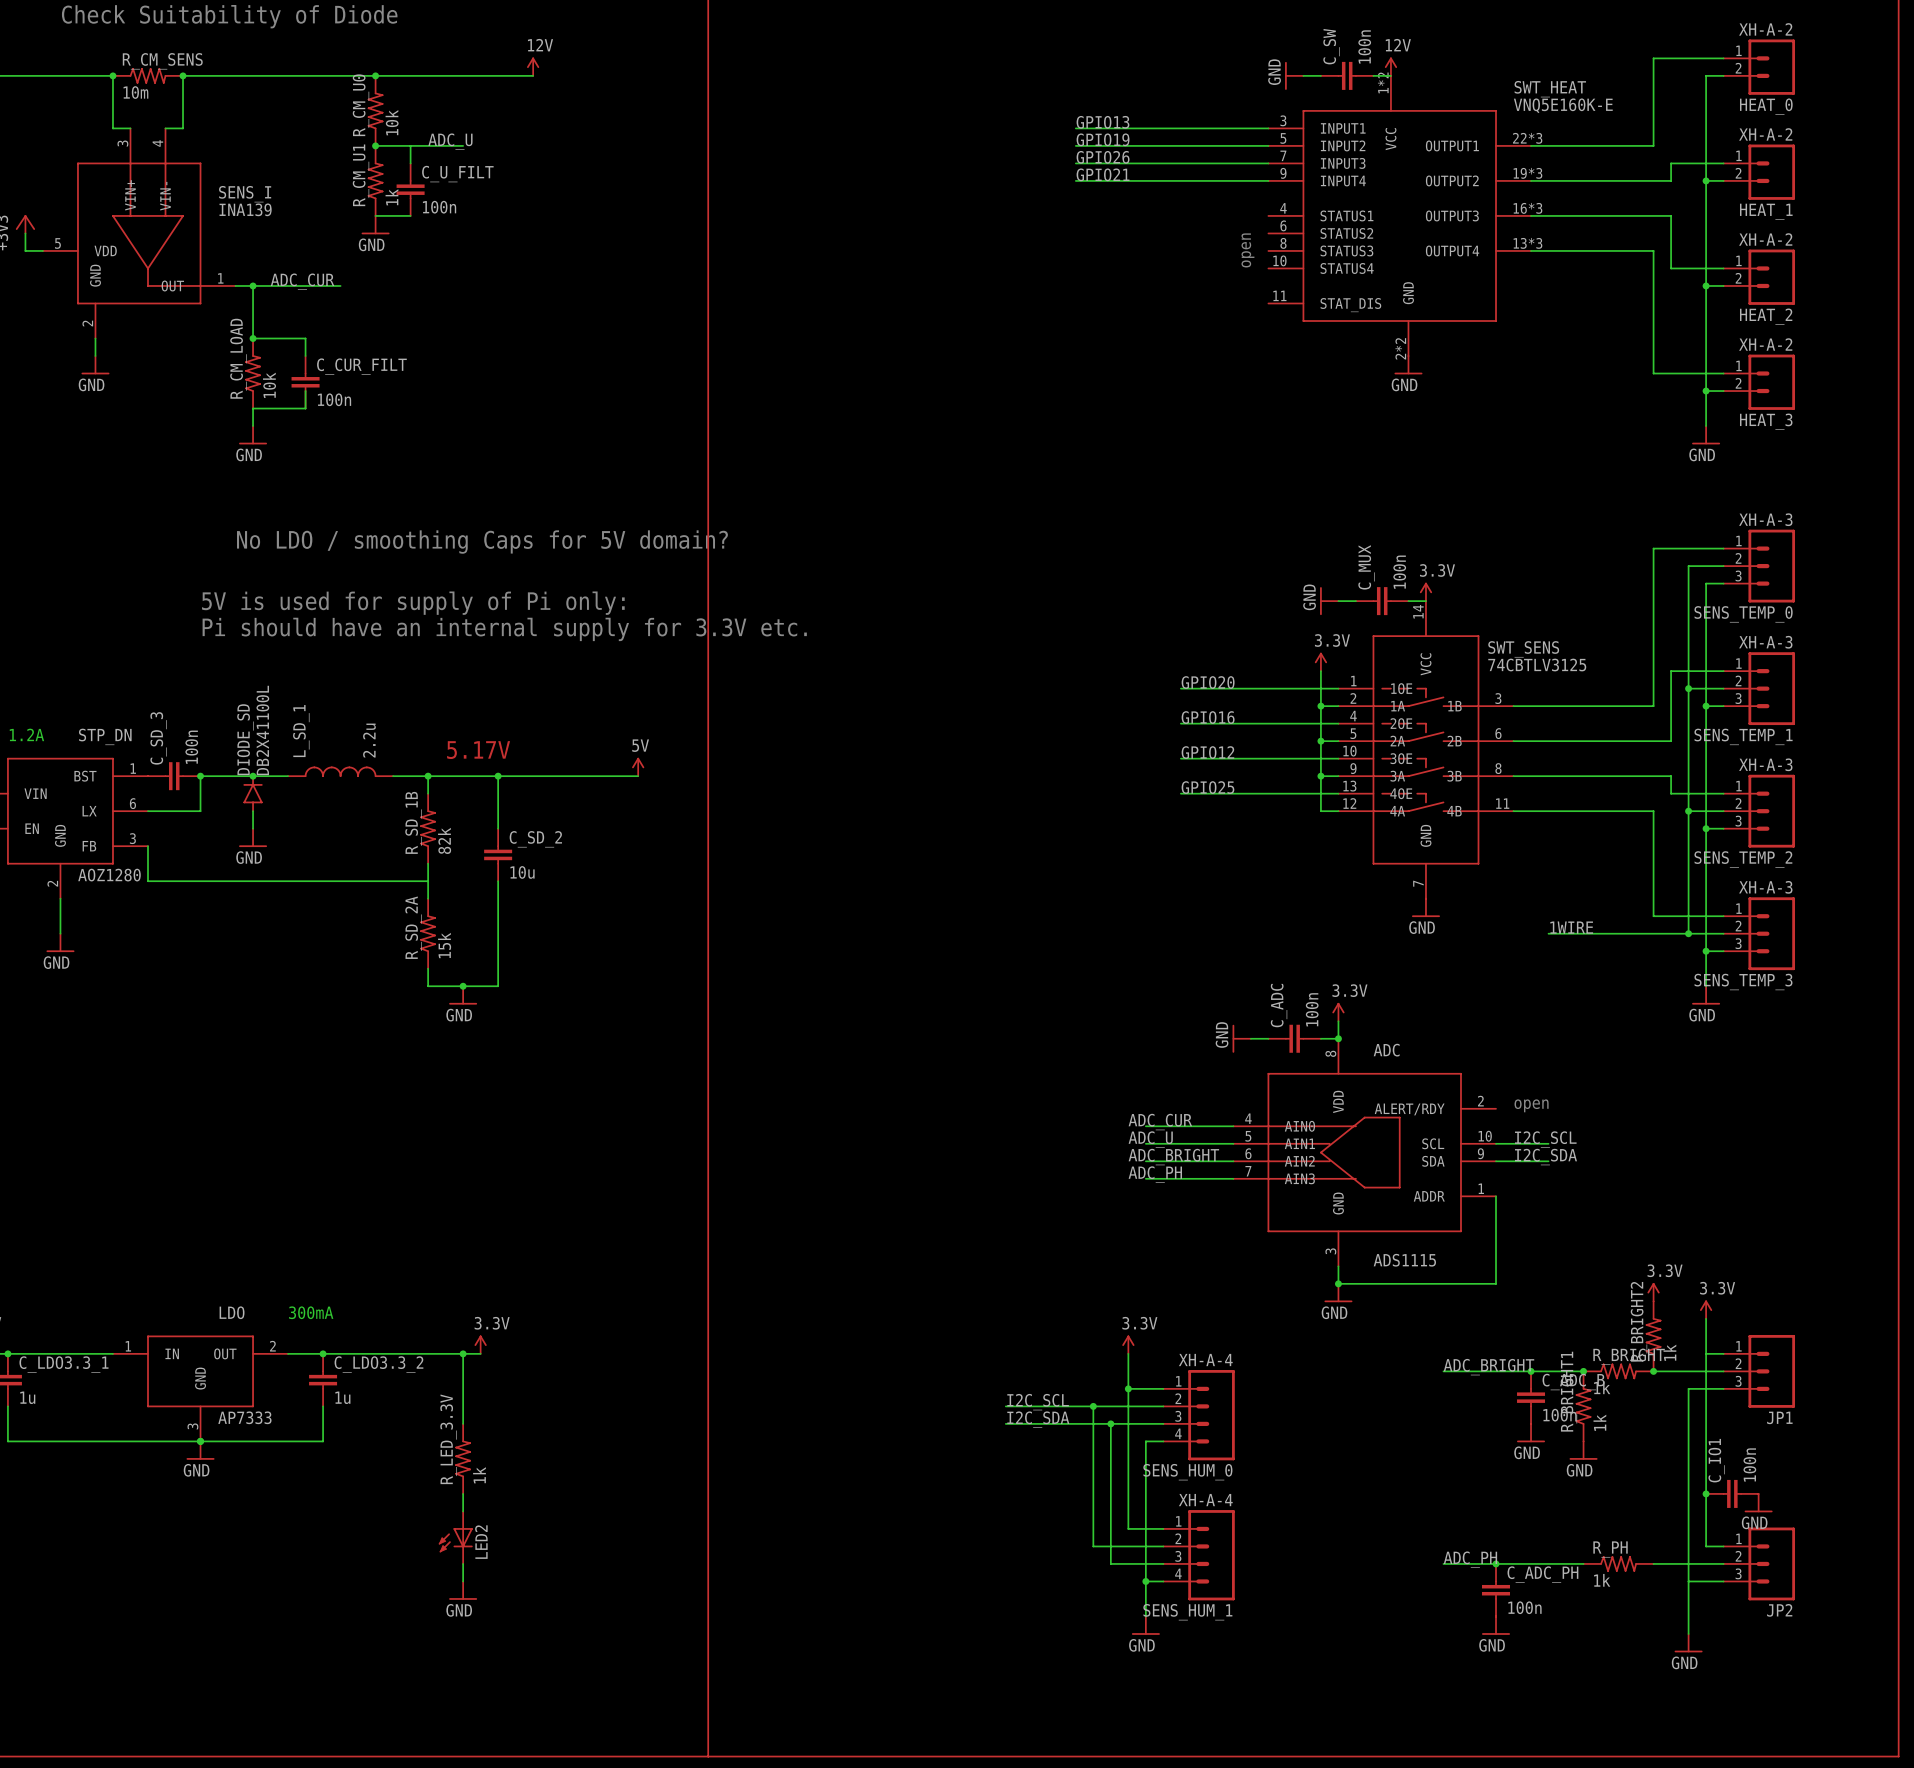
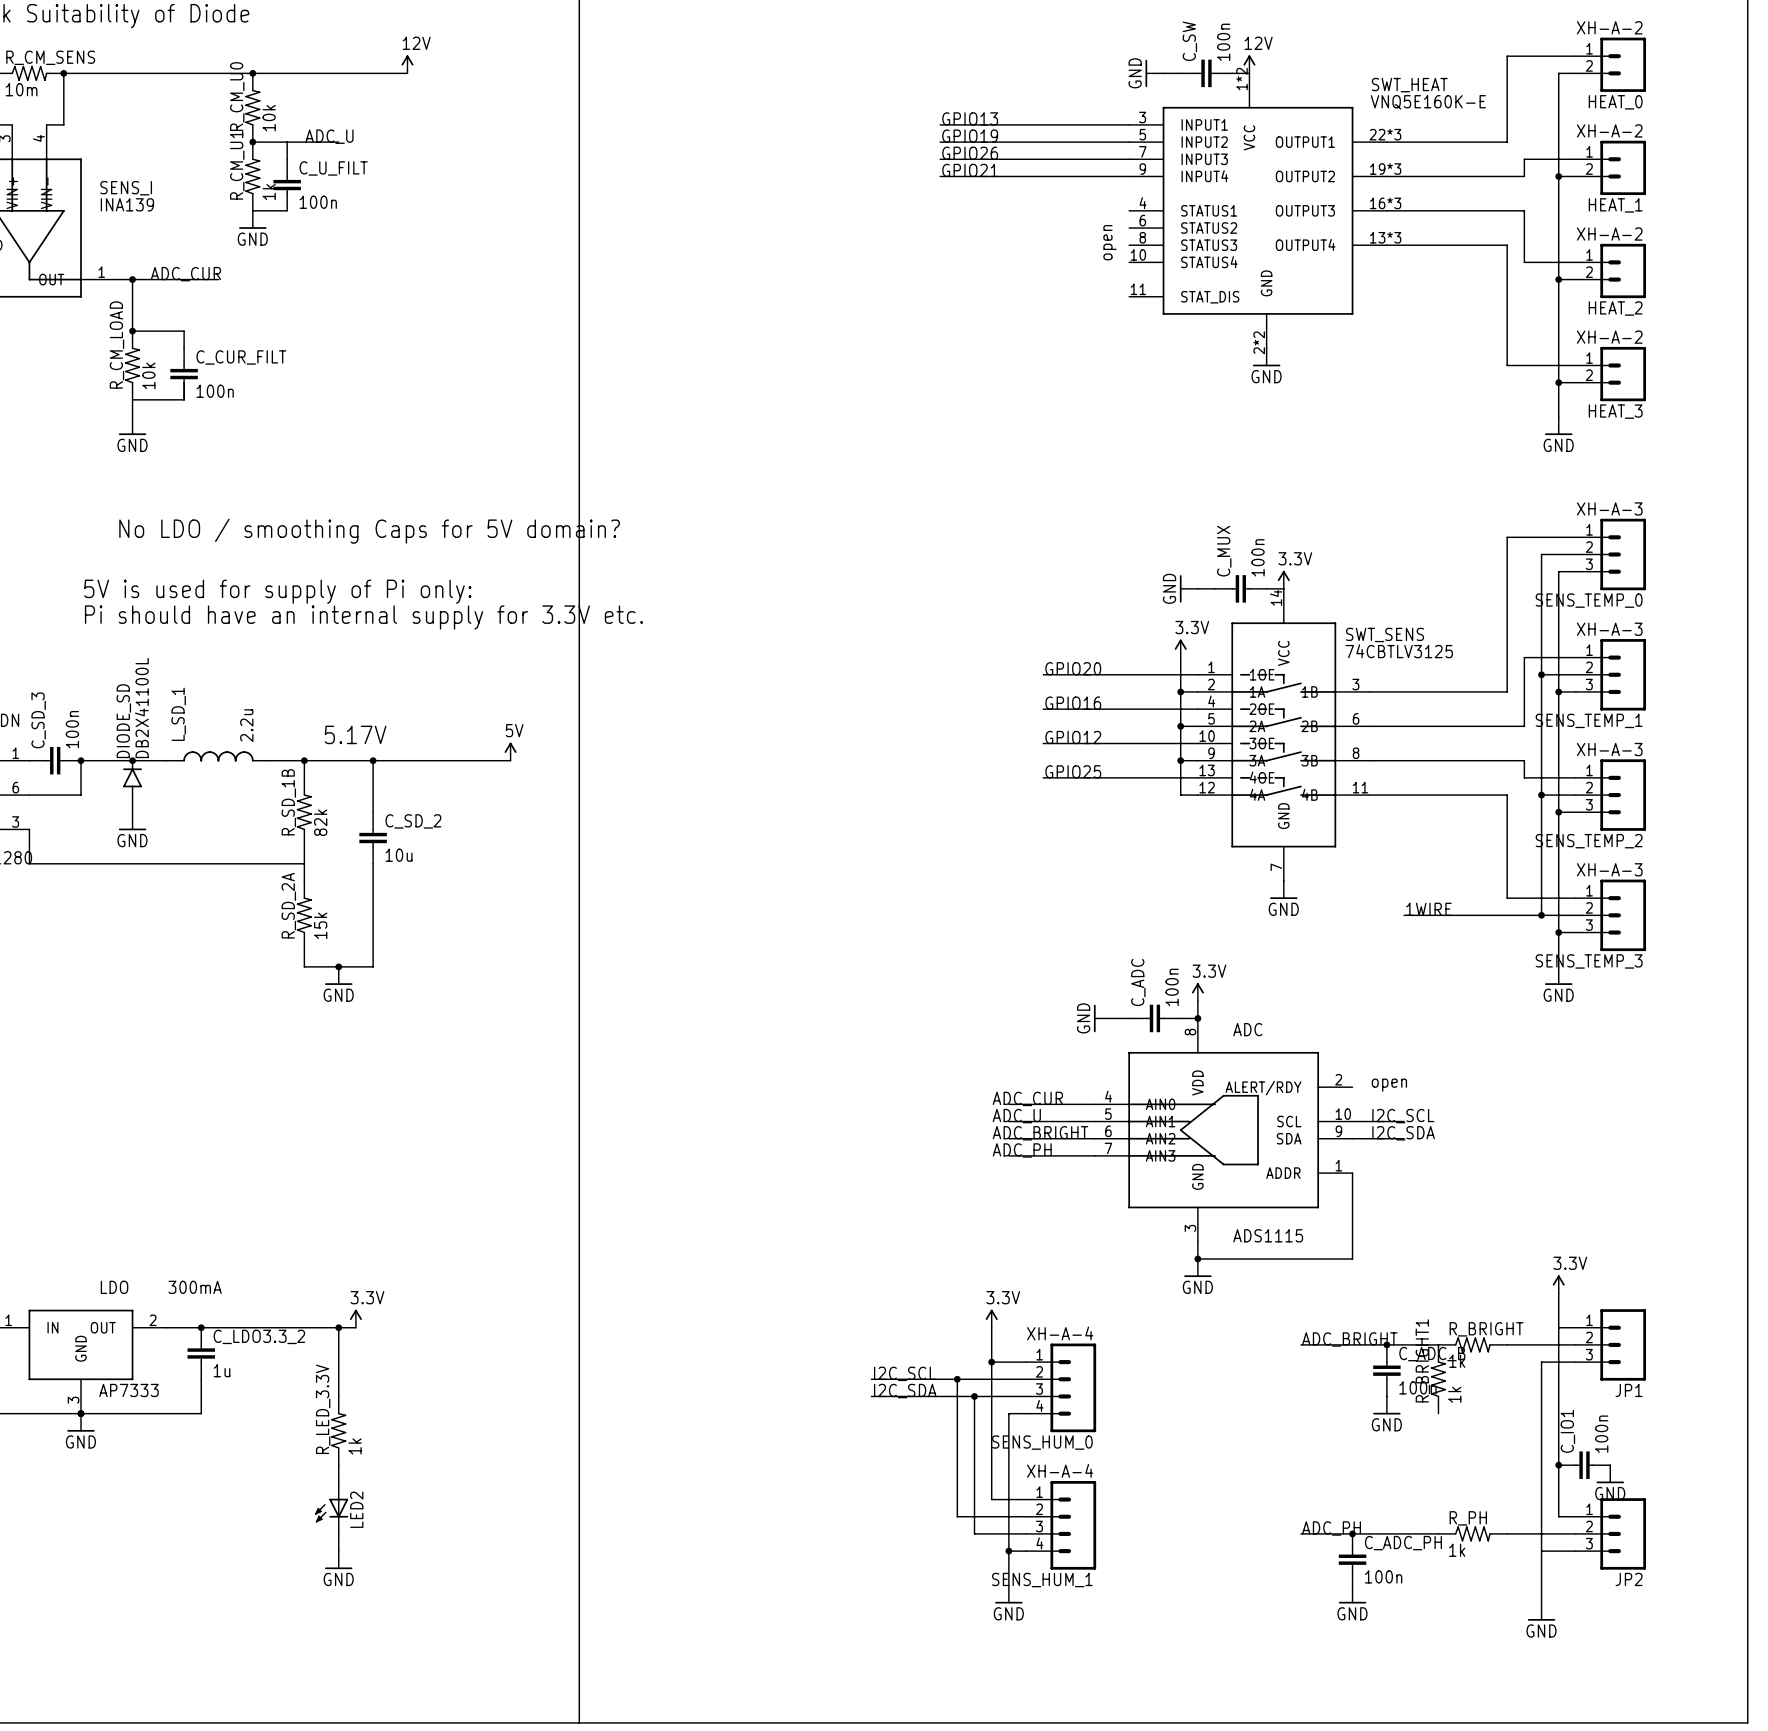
power symbol: 3.3V (1653, 1292) -> none
R_BRIGHT2: 1k (1653, 1336) -> none
junction: (1583, 1371) -> none
junction: (1653, 1371) -> none
power symbol: GND (1583, 1450) -> none

